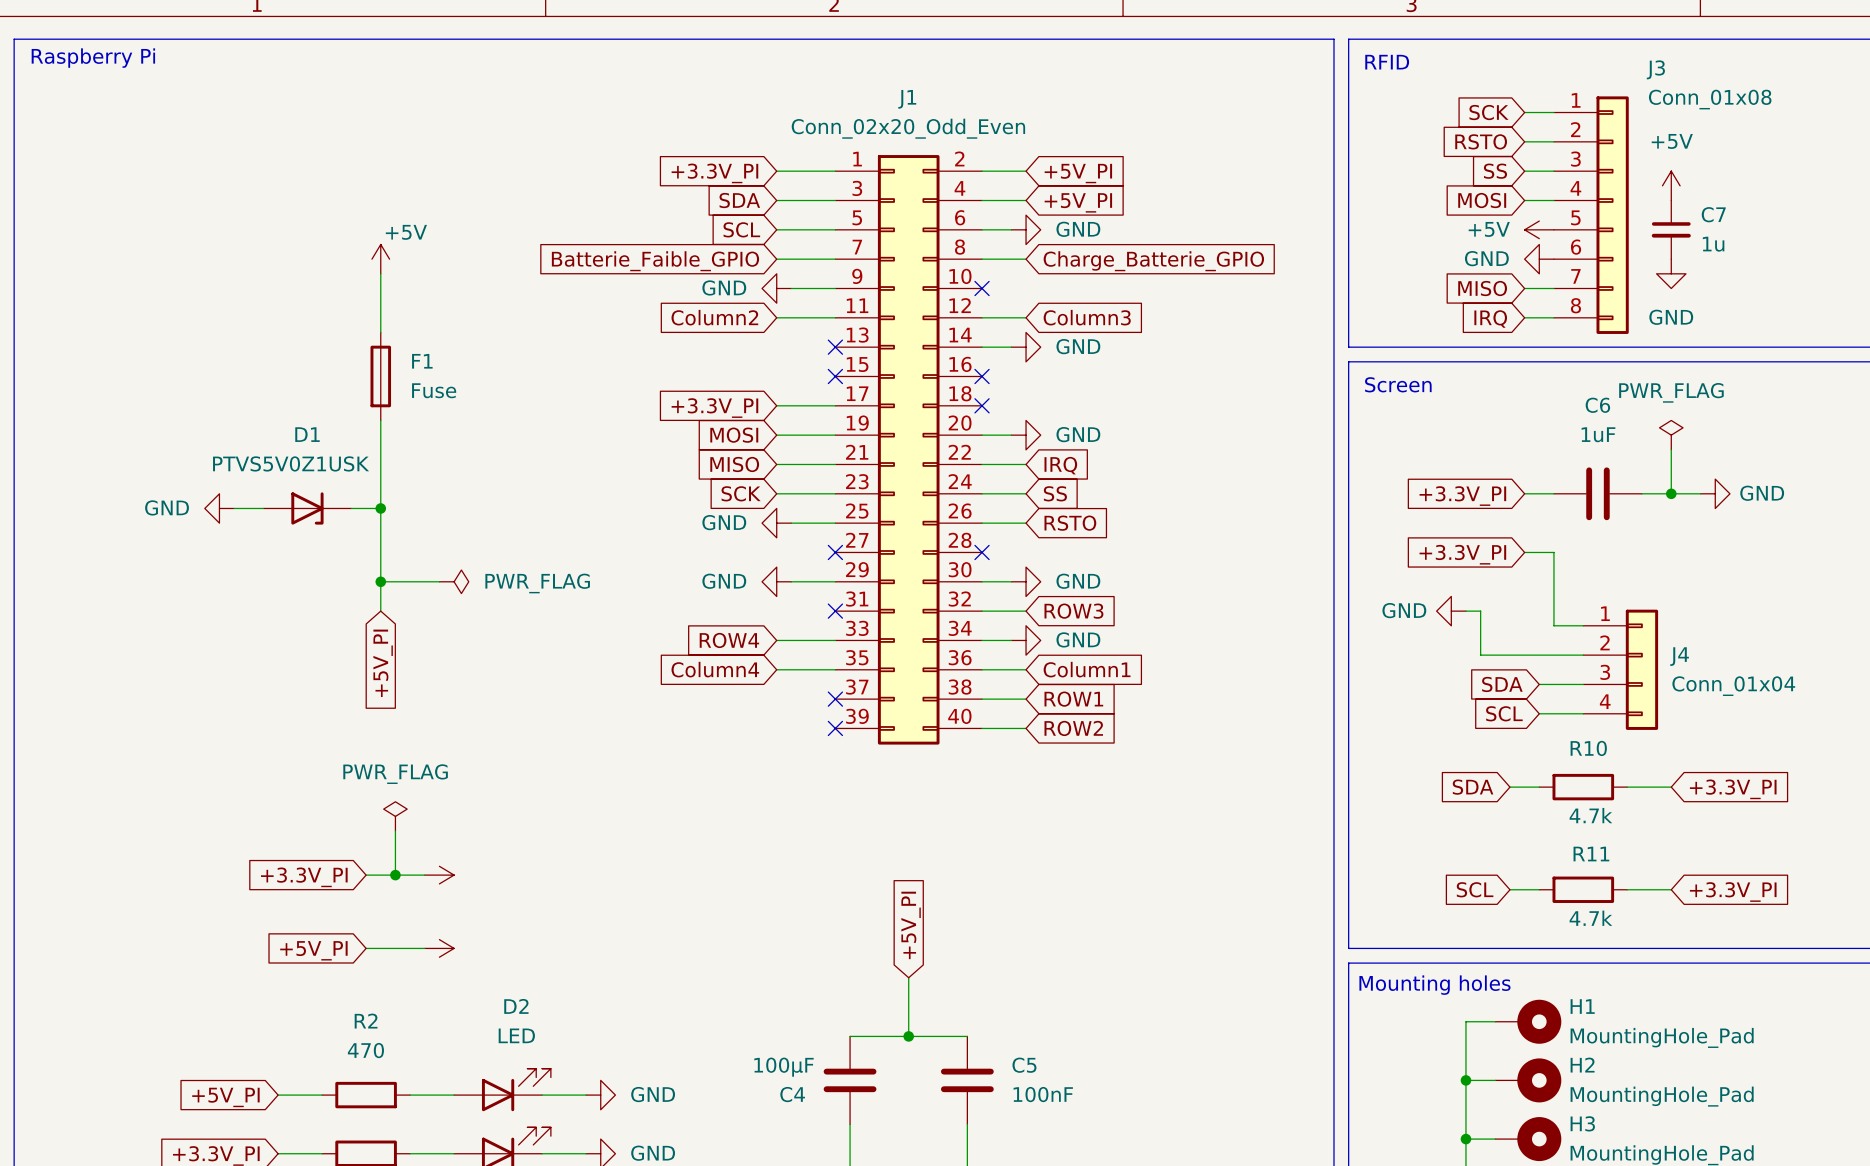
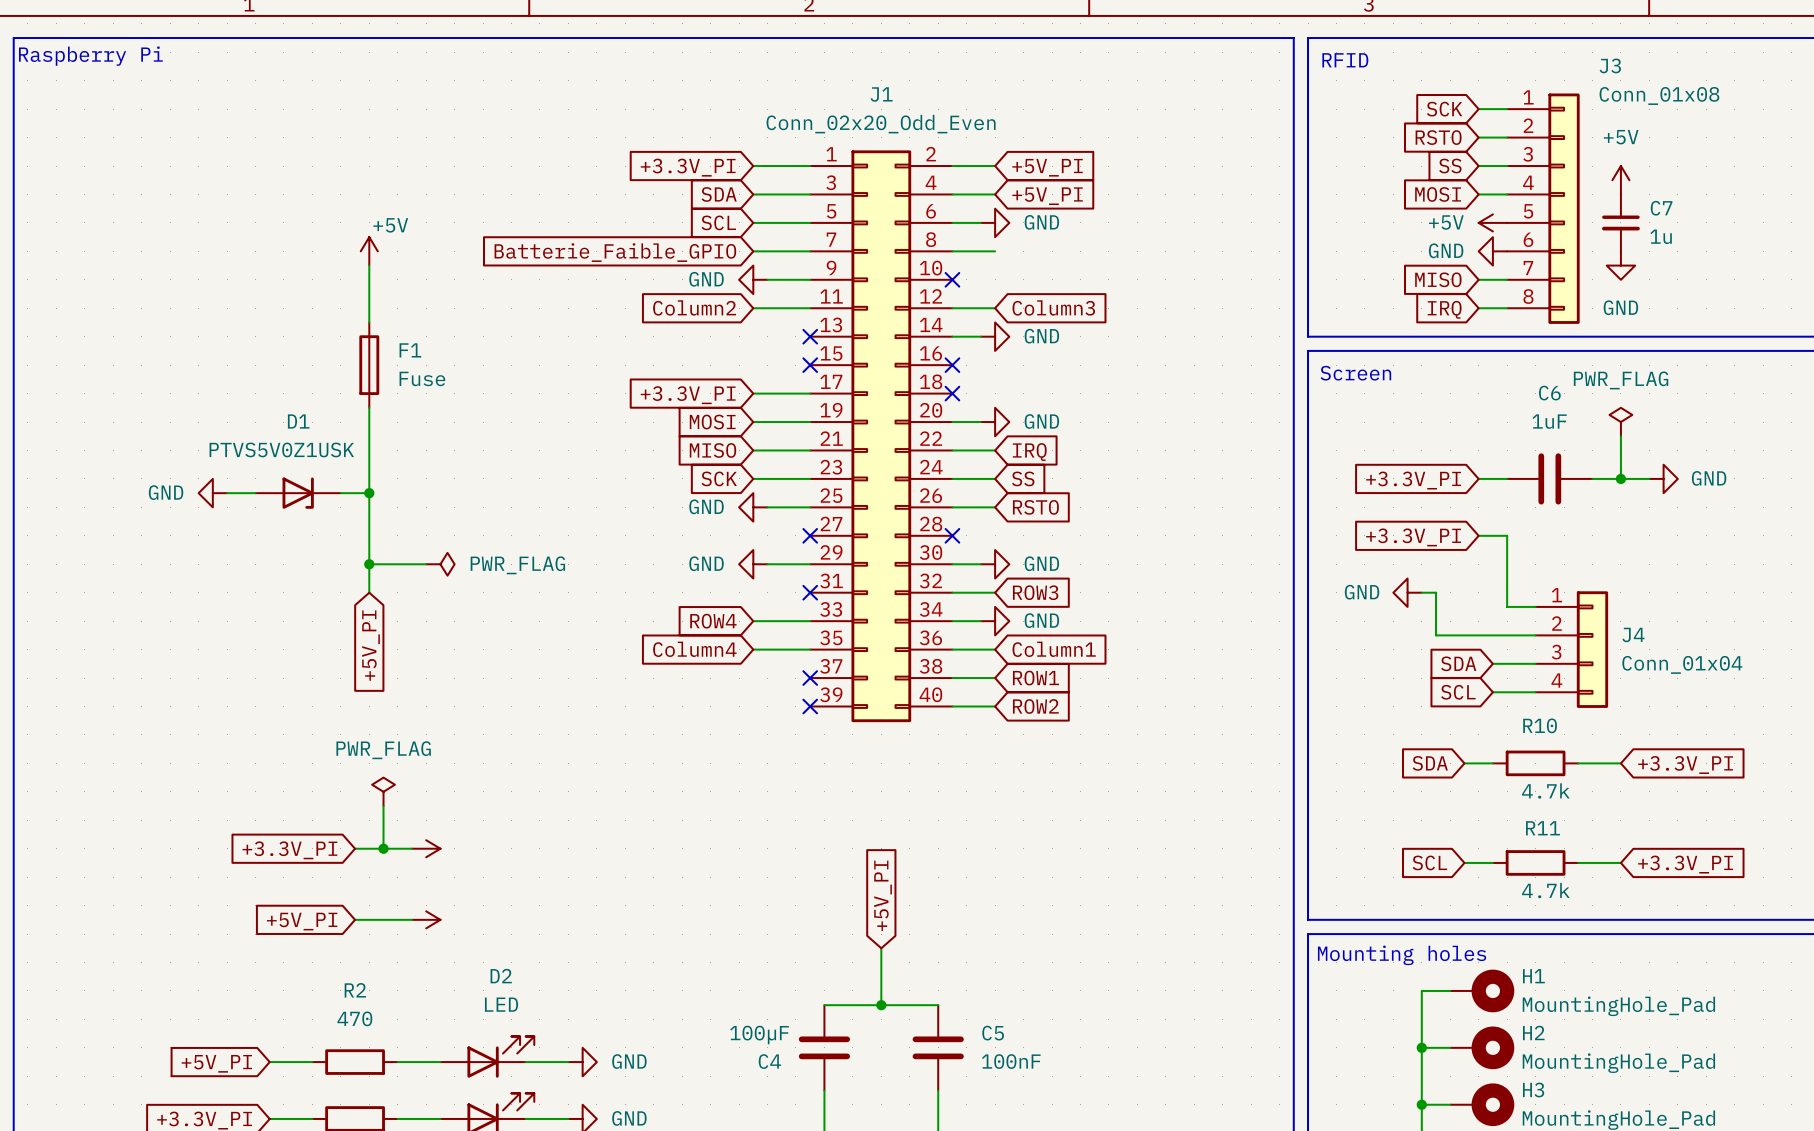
global label: Charge_Batterie_GPIO (1153, 261) -> none

